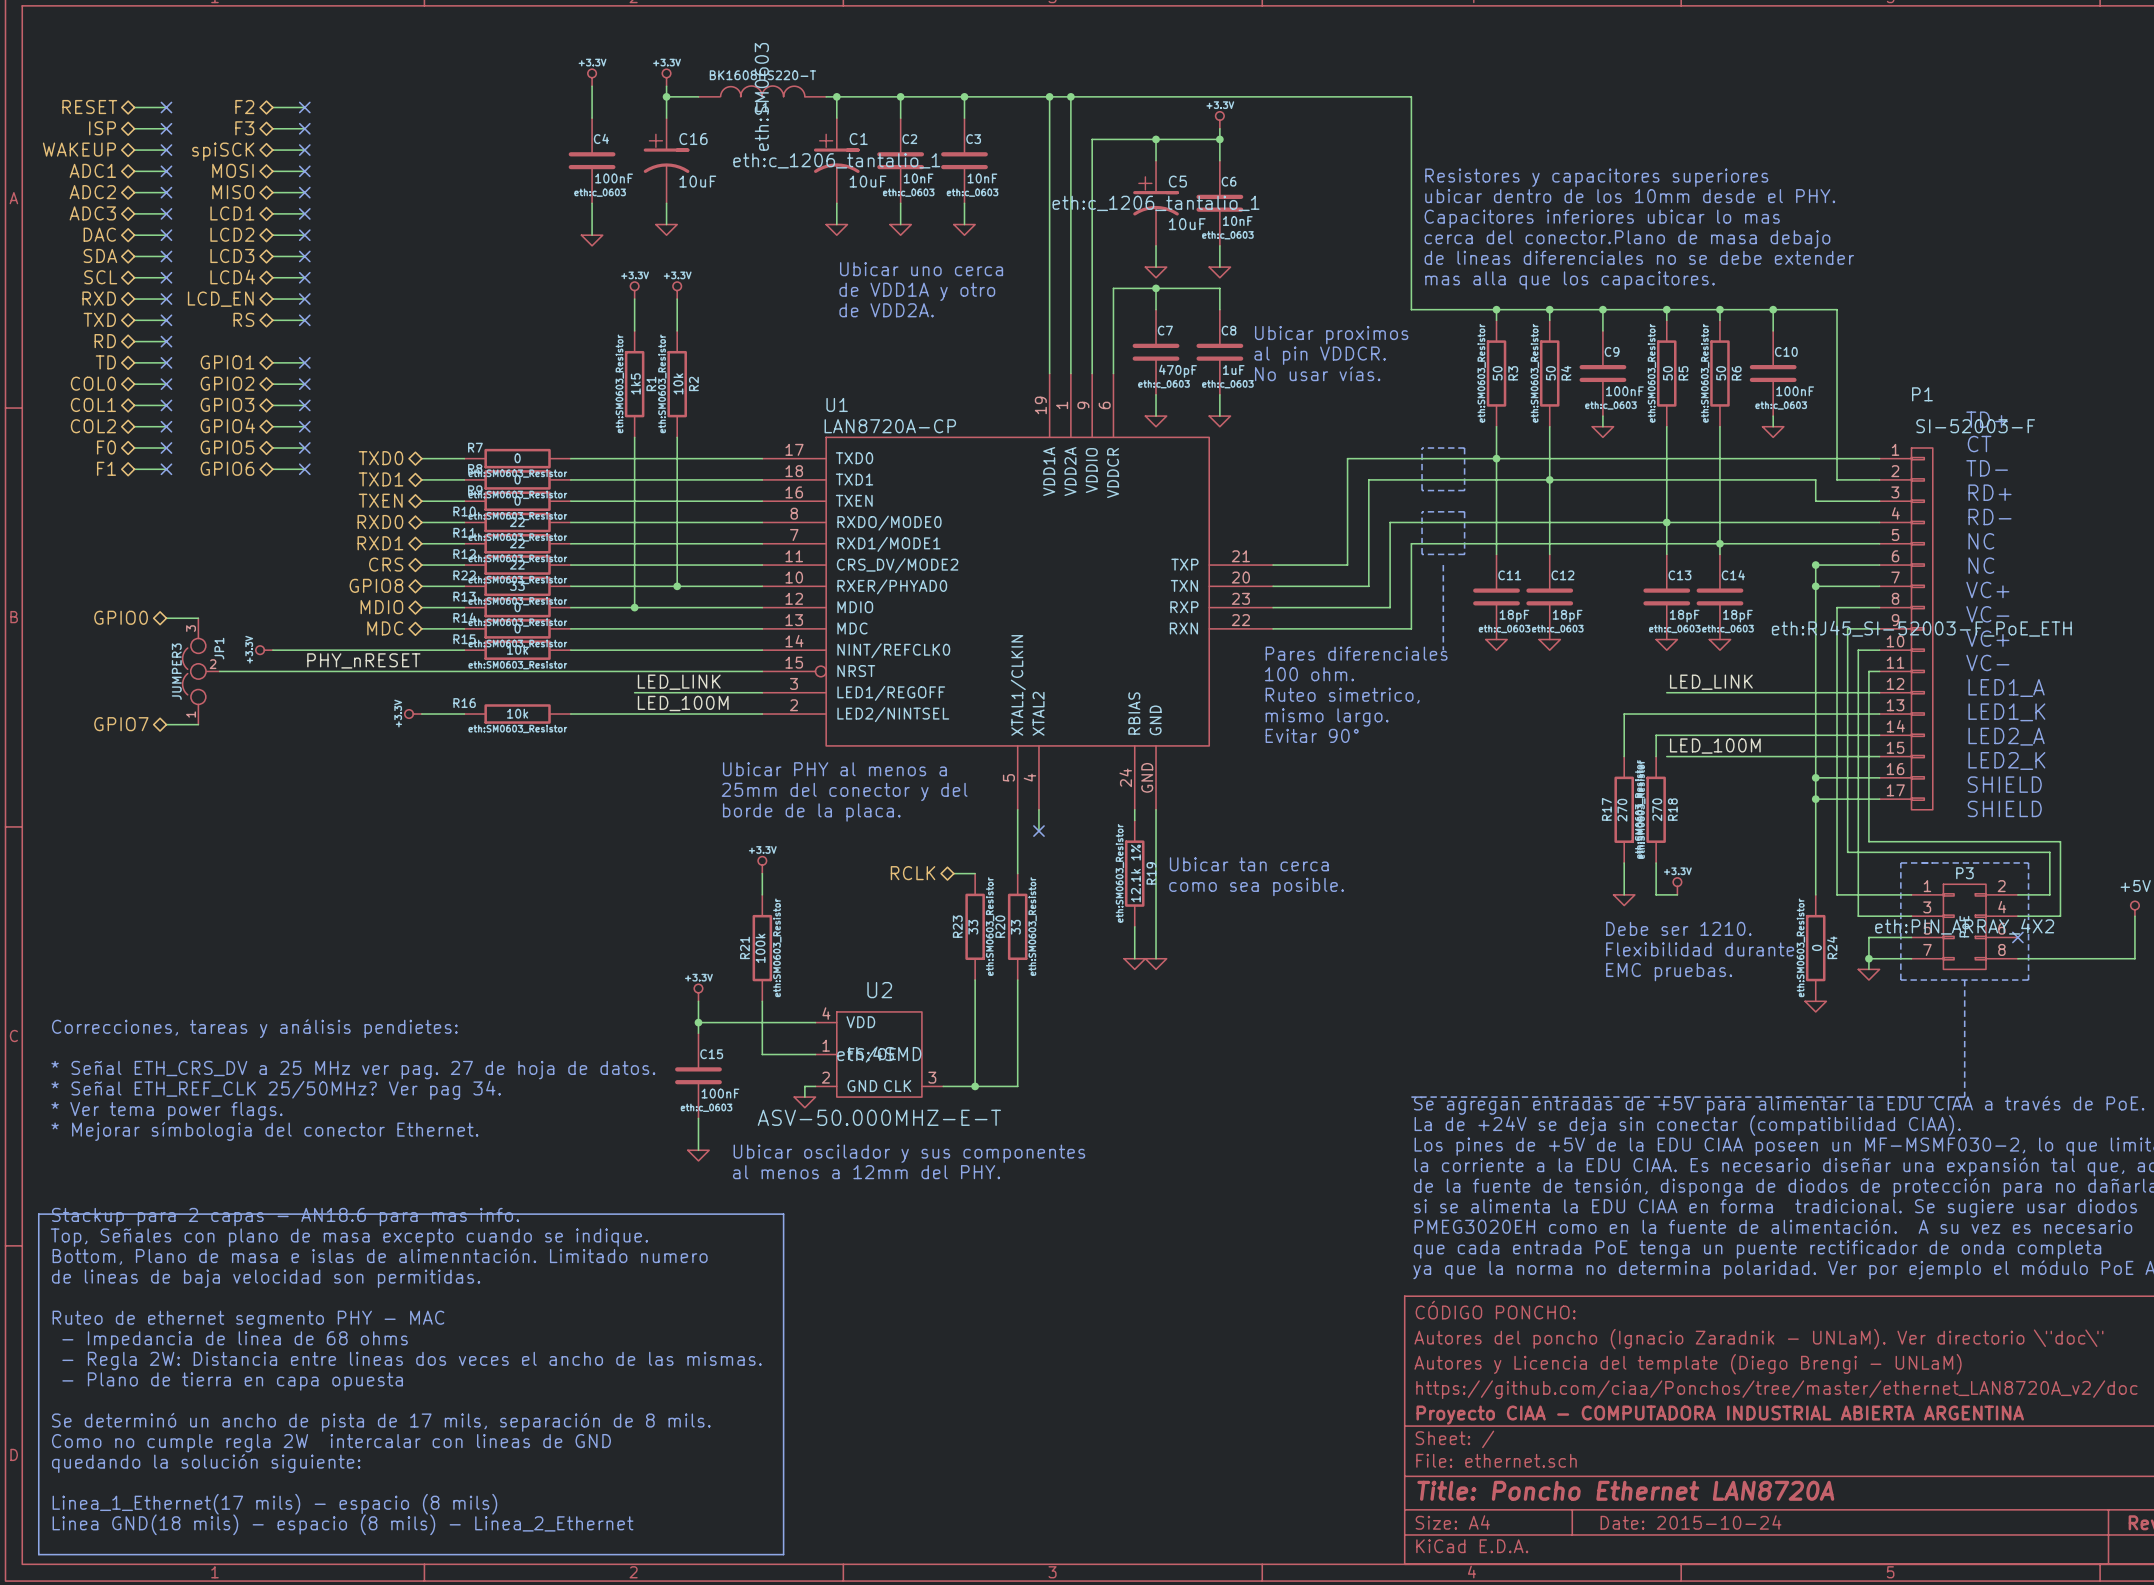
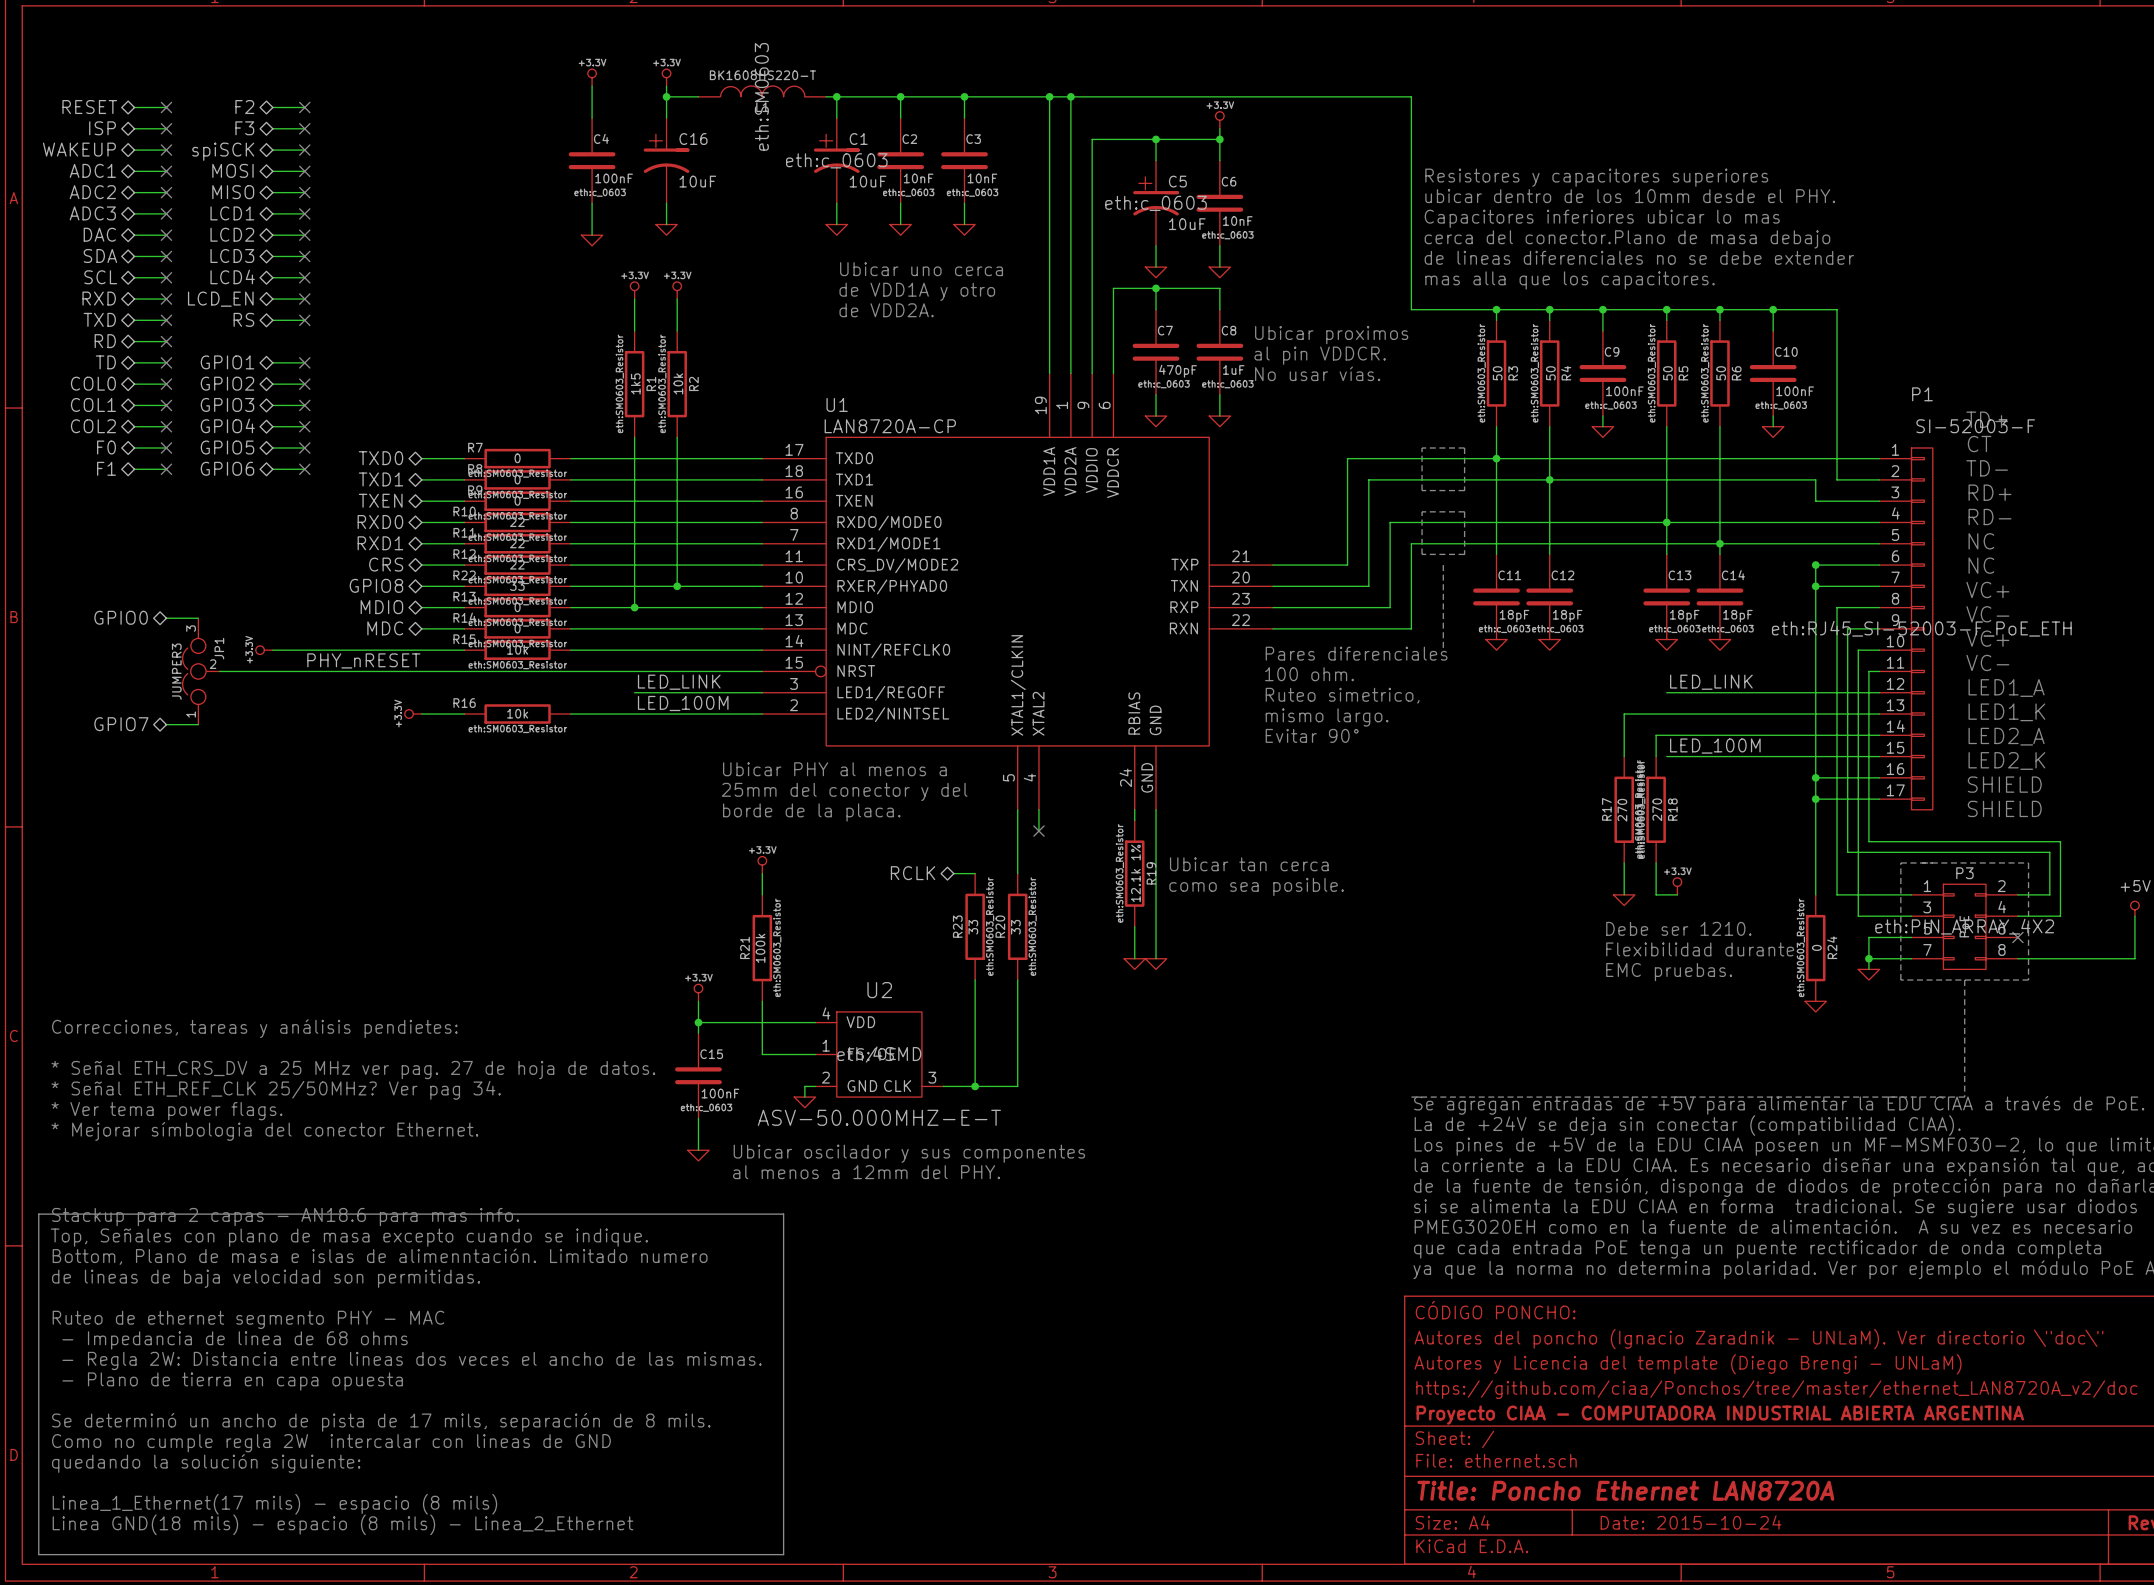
C1 text: eth:c_1206_tantalio_1 (836, 160) -> eth:c_0603 (836, 160)
C5 text: eth:c_1206_tantalio_1 (1156, 203) -> eth:c_0603 (1156, 203)

